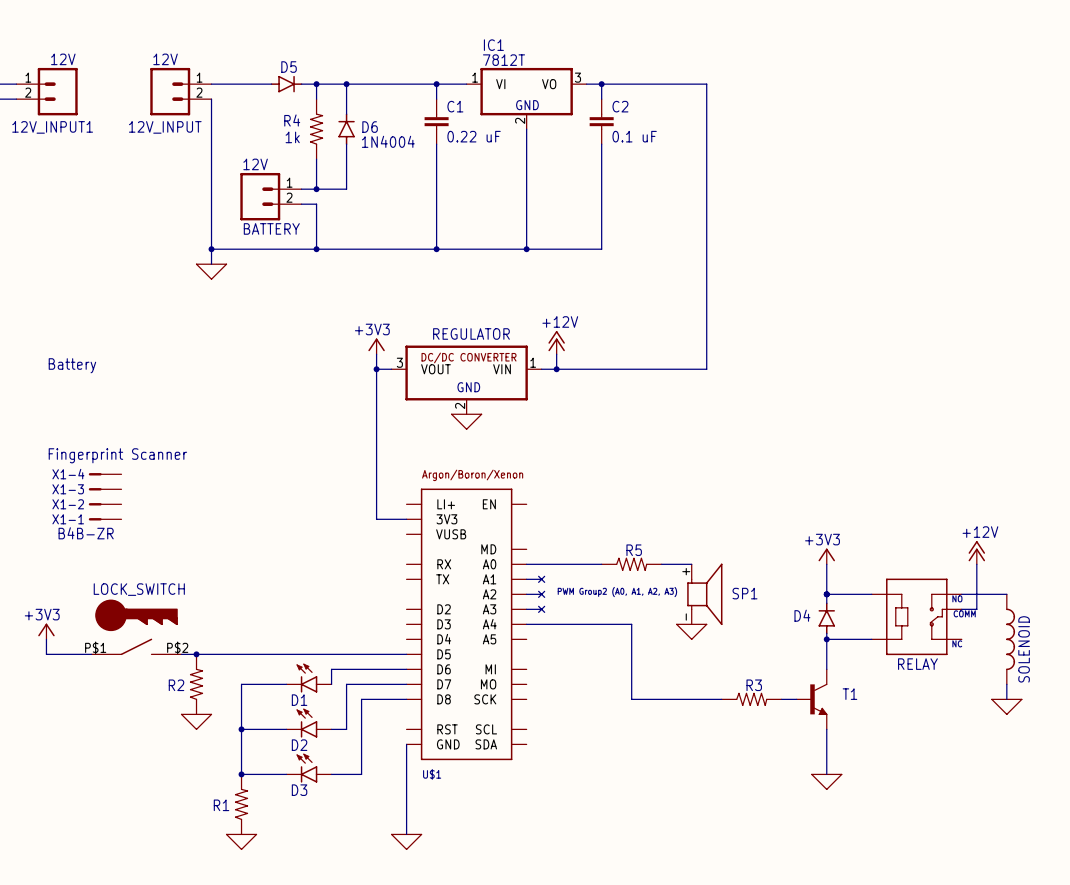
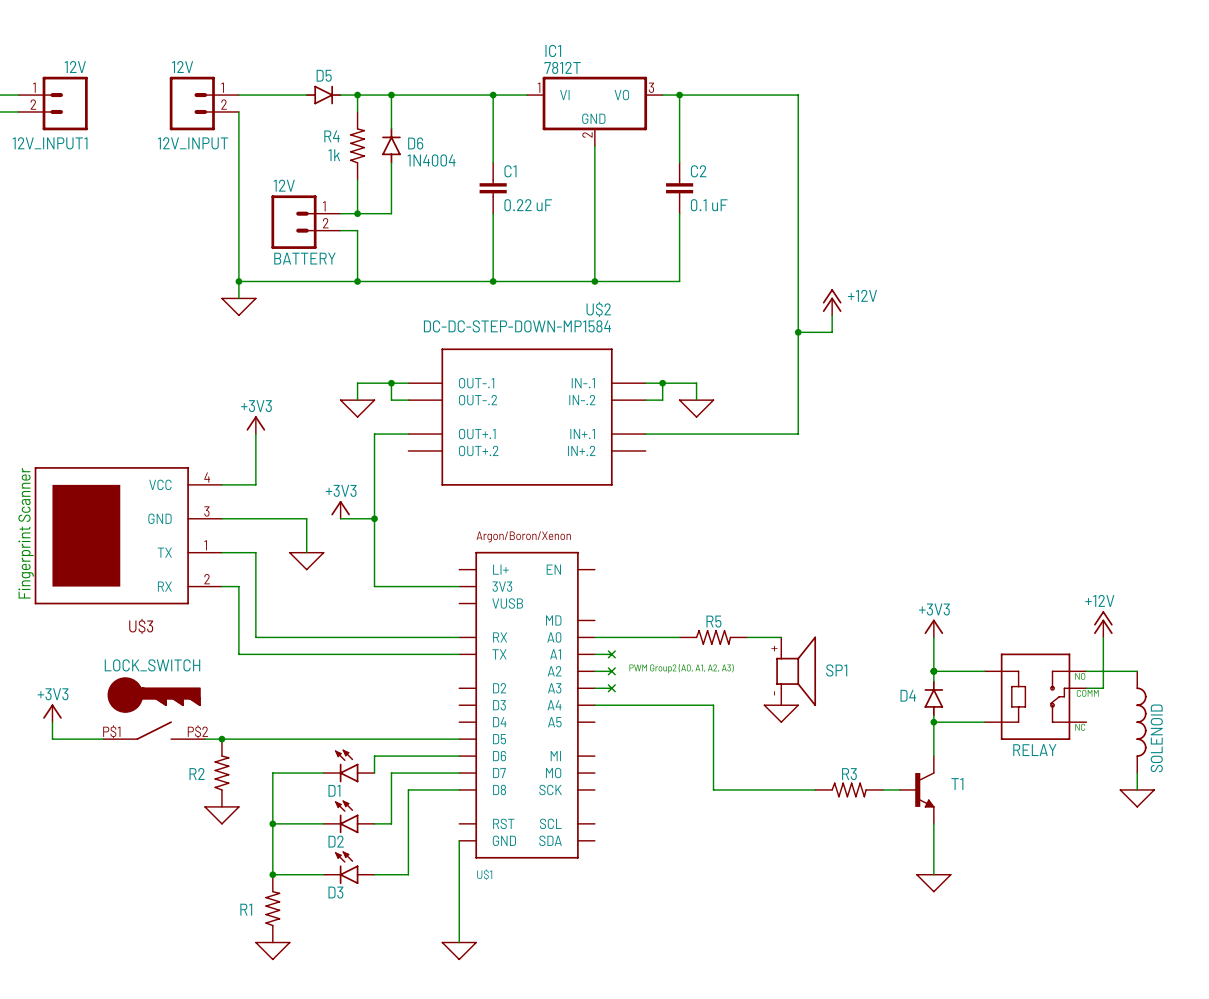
C1 position: (436, 121) -> (493, 188)
C2 position: (601, 121) -> (679, 188)
power symbol: none -> +12V (832, 302)
wire: none -> (832, 315) (832, 332) (798, 332)
junction: none -> (798, 332)
wire: none -> (391, 383) (391, 400) (408, 400)
junction: none -> (391, 383)
wire: none -> (408, 383) (357, 383) (357, 400)
wire: none -> (645, 383) (696, 383) (696, 400)
wire: none -> (662, 383) (662, 400) (645, 400)
junction: none -> (662, 383)
power symbol: +12V (556, 342) -> none
power symbol: +3V3 (376, 346) -> none
wire: (376, 354) (376, 519) -> (408, 434) (374, 434) (374, 586) (425, 586)
wire: (556, 354) (556, 369) -> none
power symbol: none -> (357, 408)
power symbol: none -> (696, 408)
text: Battery (72, 365) -> none
wire: (376, 369) (391, 369) -> none
junction: (376, 369) -> none
U$2: none -> DC-DC-STEP-DOWN-MP1584 (527, 417)
wire: (541, 369) (706, 369) -> (645, 434) (798, 434) (798, 417)
junction: (556, 369) -> none
power symbol: none -> +3V3 (255, 425)
REGULATOR: (466, 379) -> none
wire: none -> (255, 434) (255, 484) (221, 484)
power symbol: (466, 421) -> none
power symbol: none -> +3V3 (340, 509)
text rotation: 0° (117, 455) -> 90° counterclockwise (26, 533)
wire: none -> (221, 518) (306, 518) (306, 552)
wire: none -> (340, 518) (374, 518)
junction: none -> (374, 518)
X1-4: (105, 474) -> none
U$3: none -> (128, 535)
X1-3: (105, 489) -> none
wire: none -> (221, 552) (255, 552) (255, 637) (459, 637)
power symbol: none -> (306, 561)
X1-2: (105, 504) -> none
X1-1: B4B-ZR (105, 519) -> none
wire: none -> (221, 586) (238, 586) (238, 654) (459, 654)

